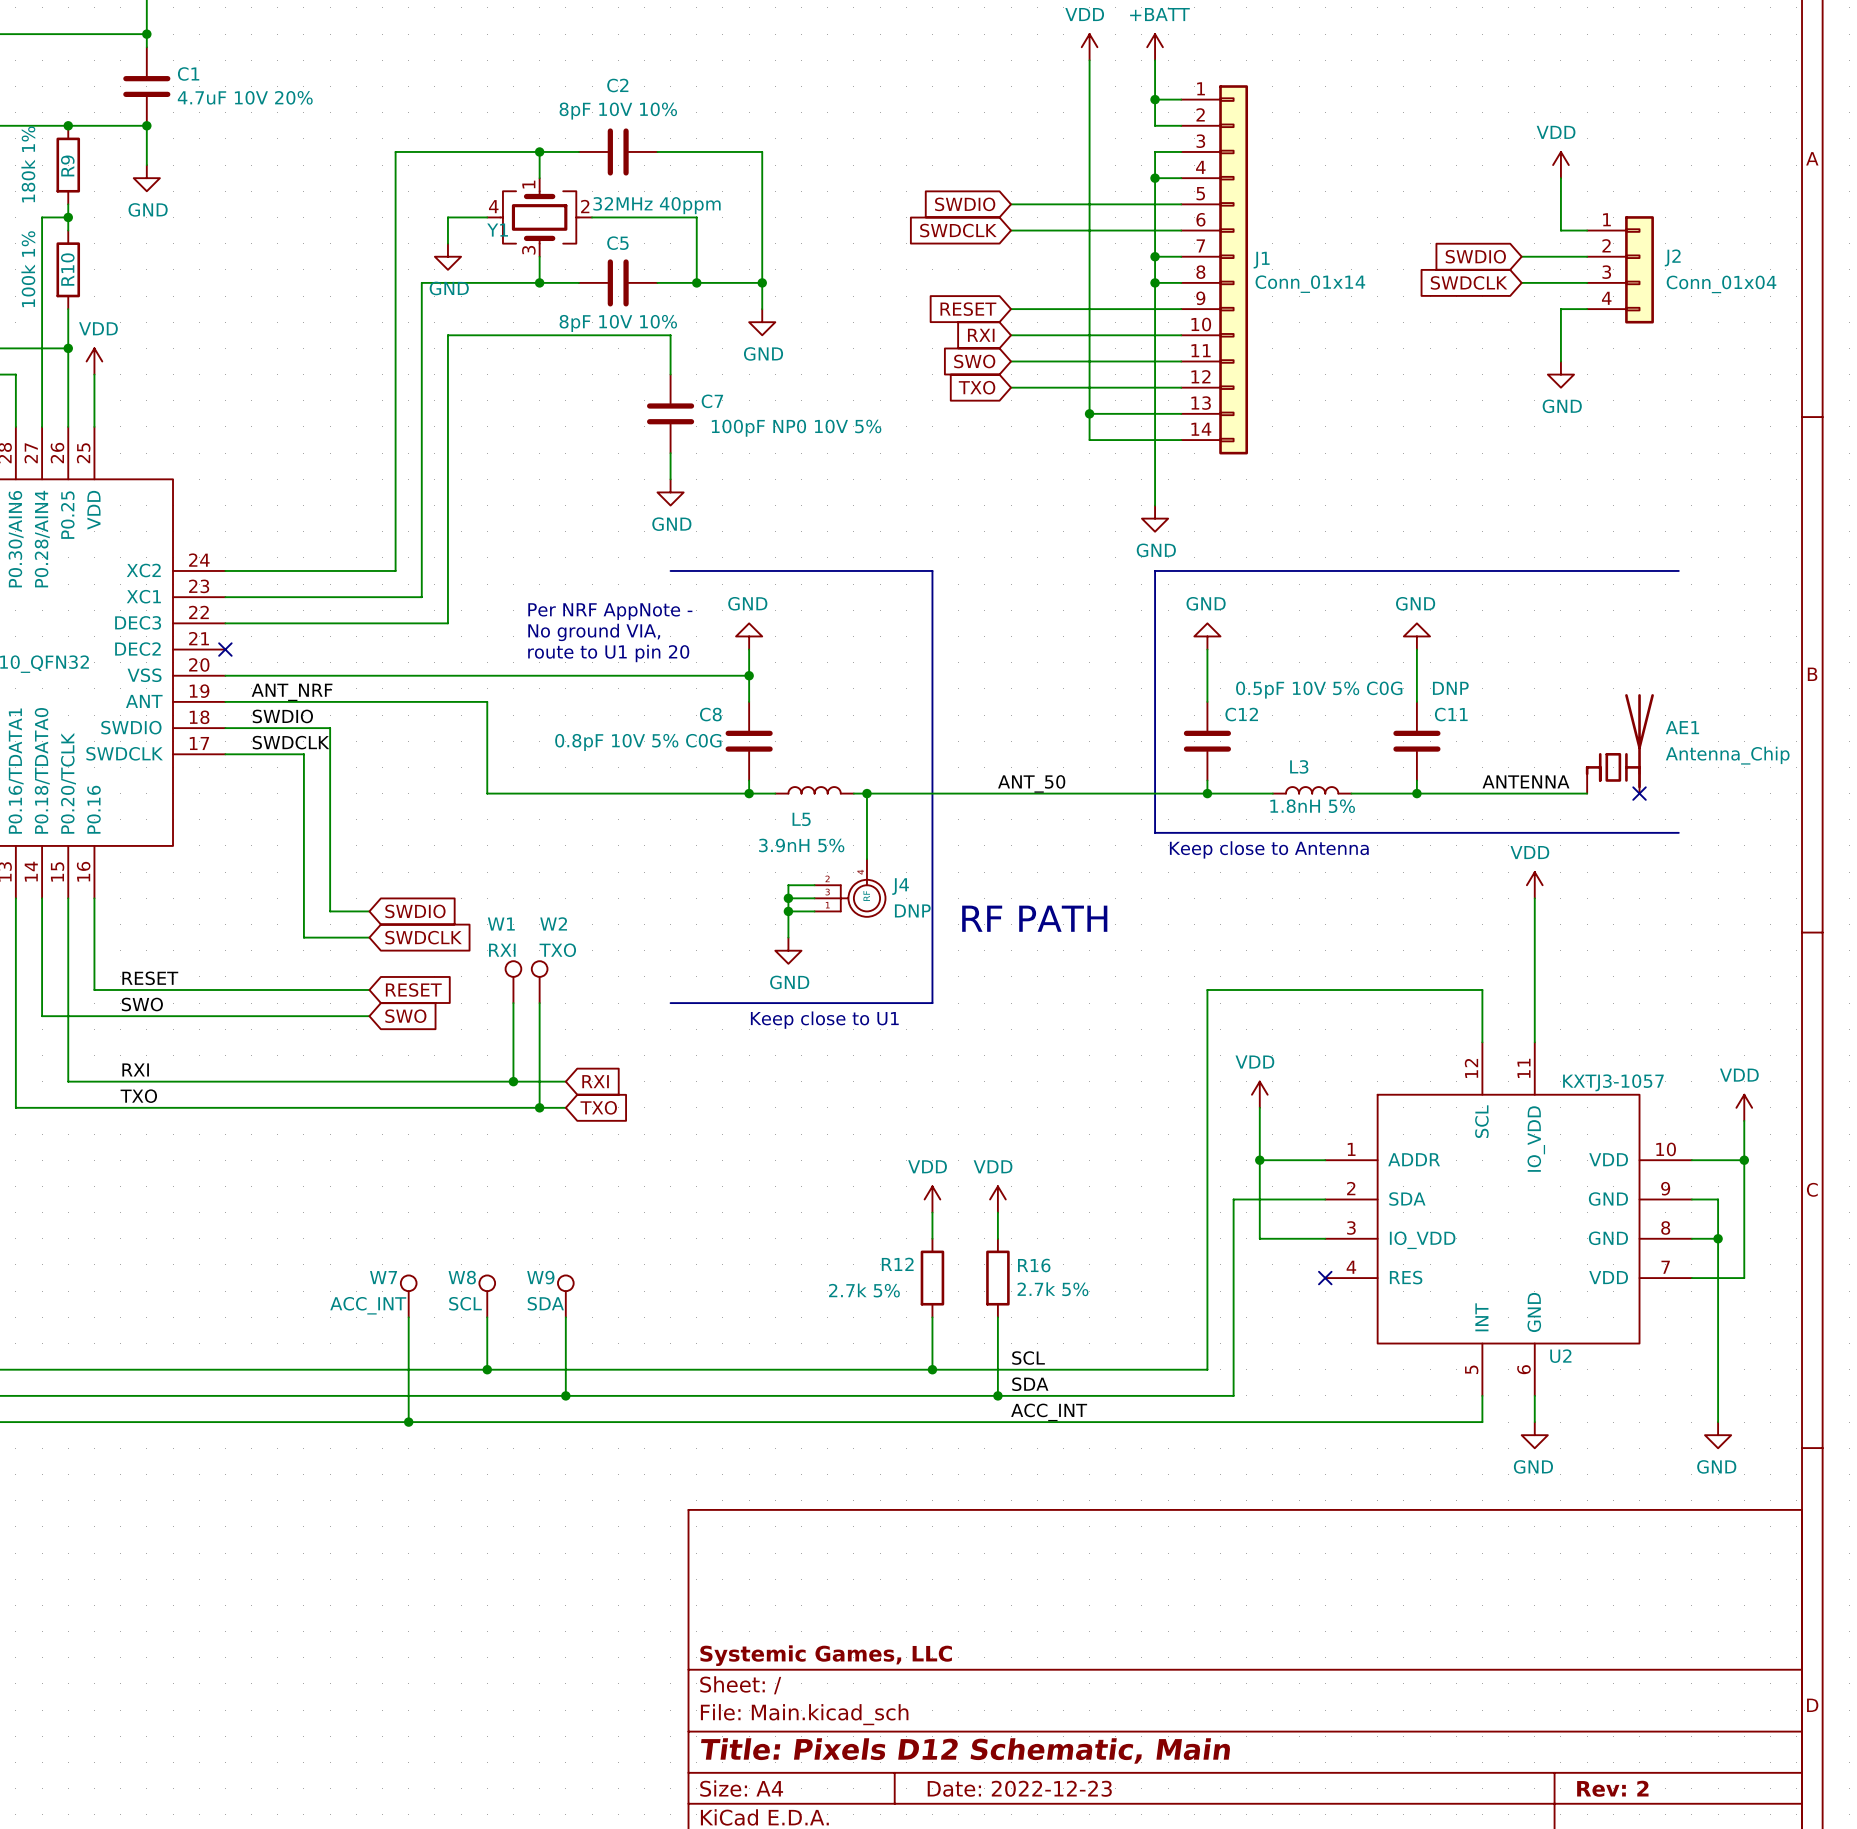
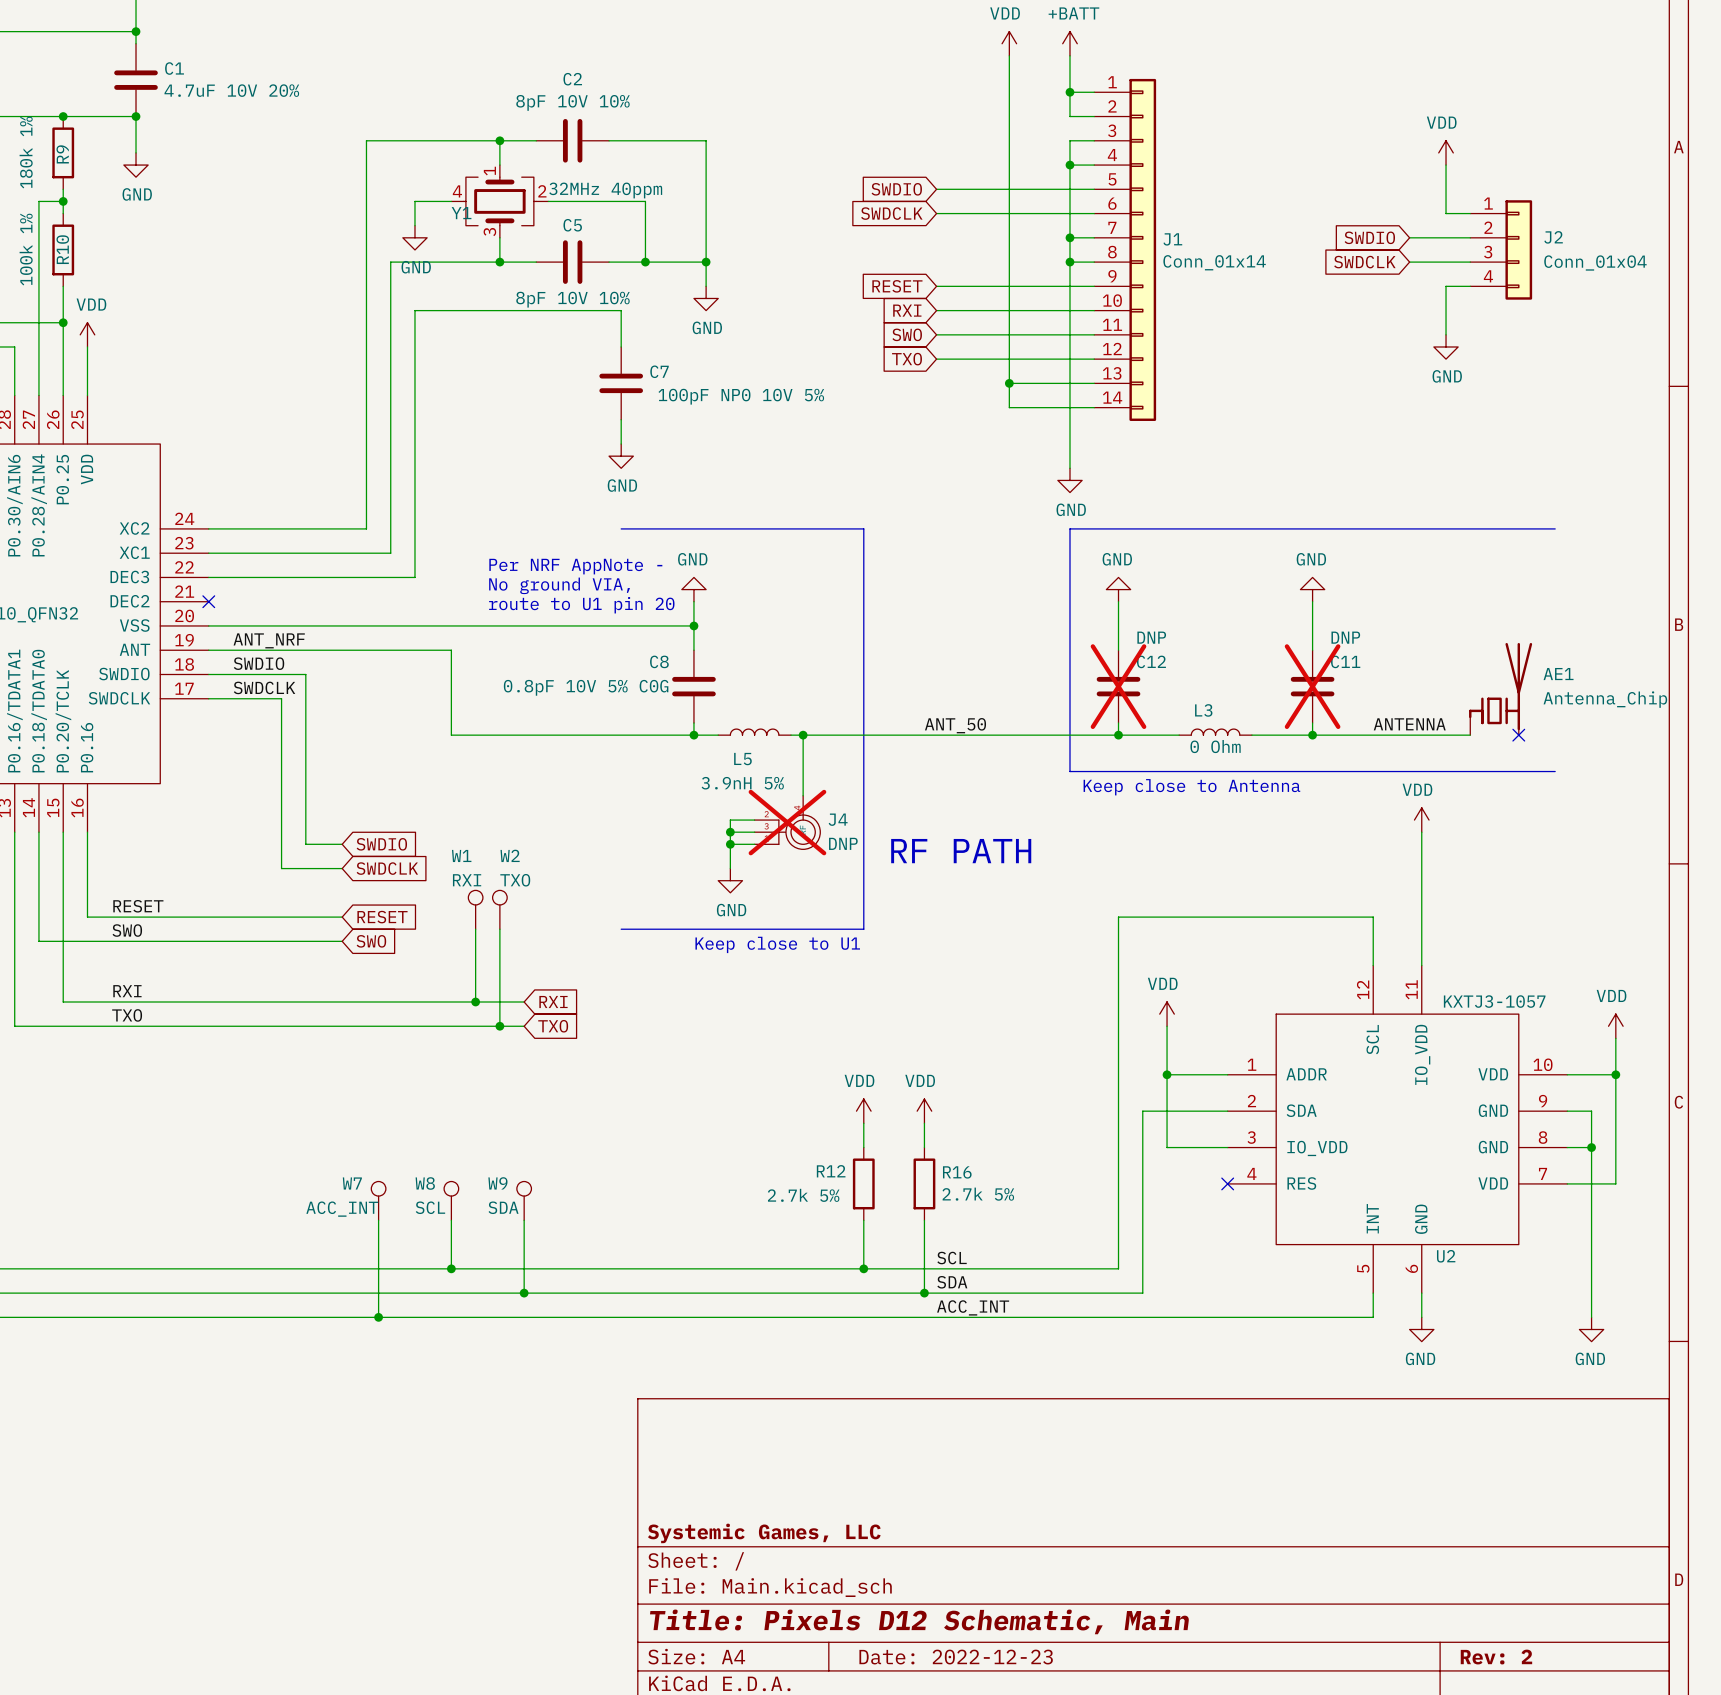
C12 value: 0.5pF 10V 5% C0G (1319, 690) -> DNP (1151, 637)
C12 do-not-place cross: none -> (1118, 686)
C11 do-not-place cross: none -> (1312, 686)
L3 value: 1.8nH 5% (1312, 806) -> 0 Ohm (1215, 746)
J4 do-not-place cross: none -> (787, 822)

